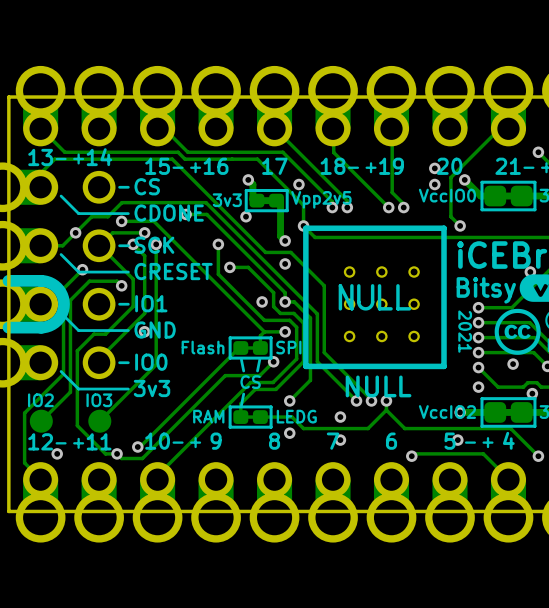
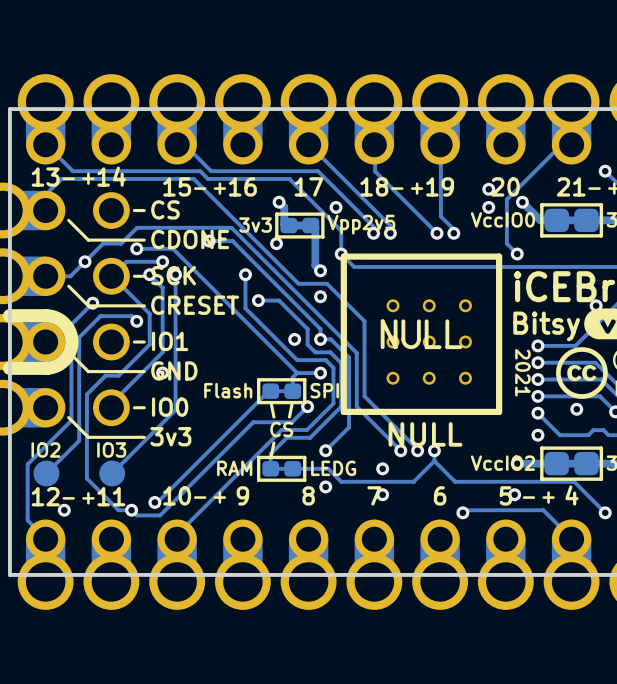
via: (532, 393) -> none

